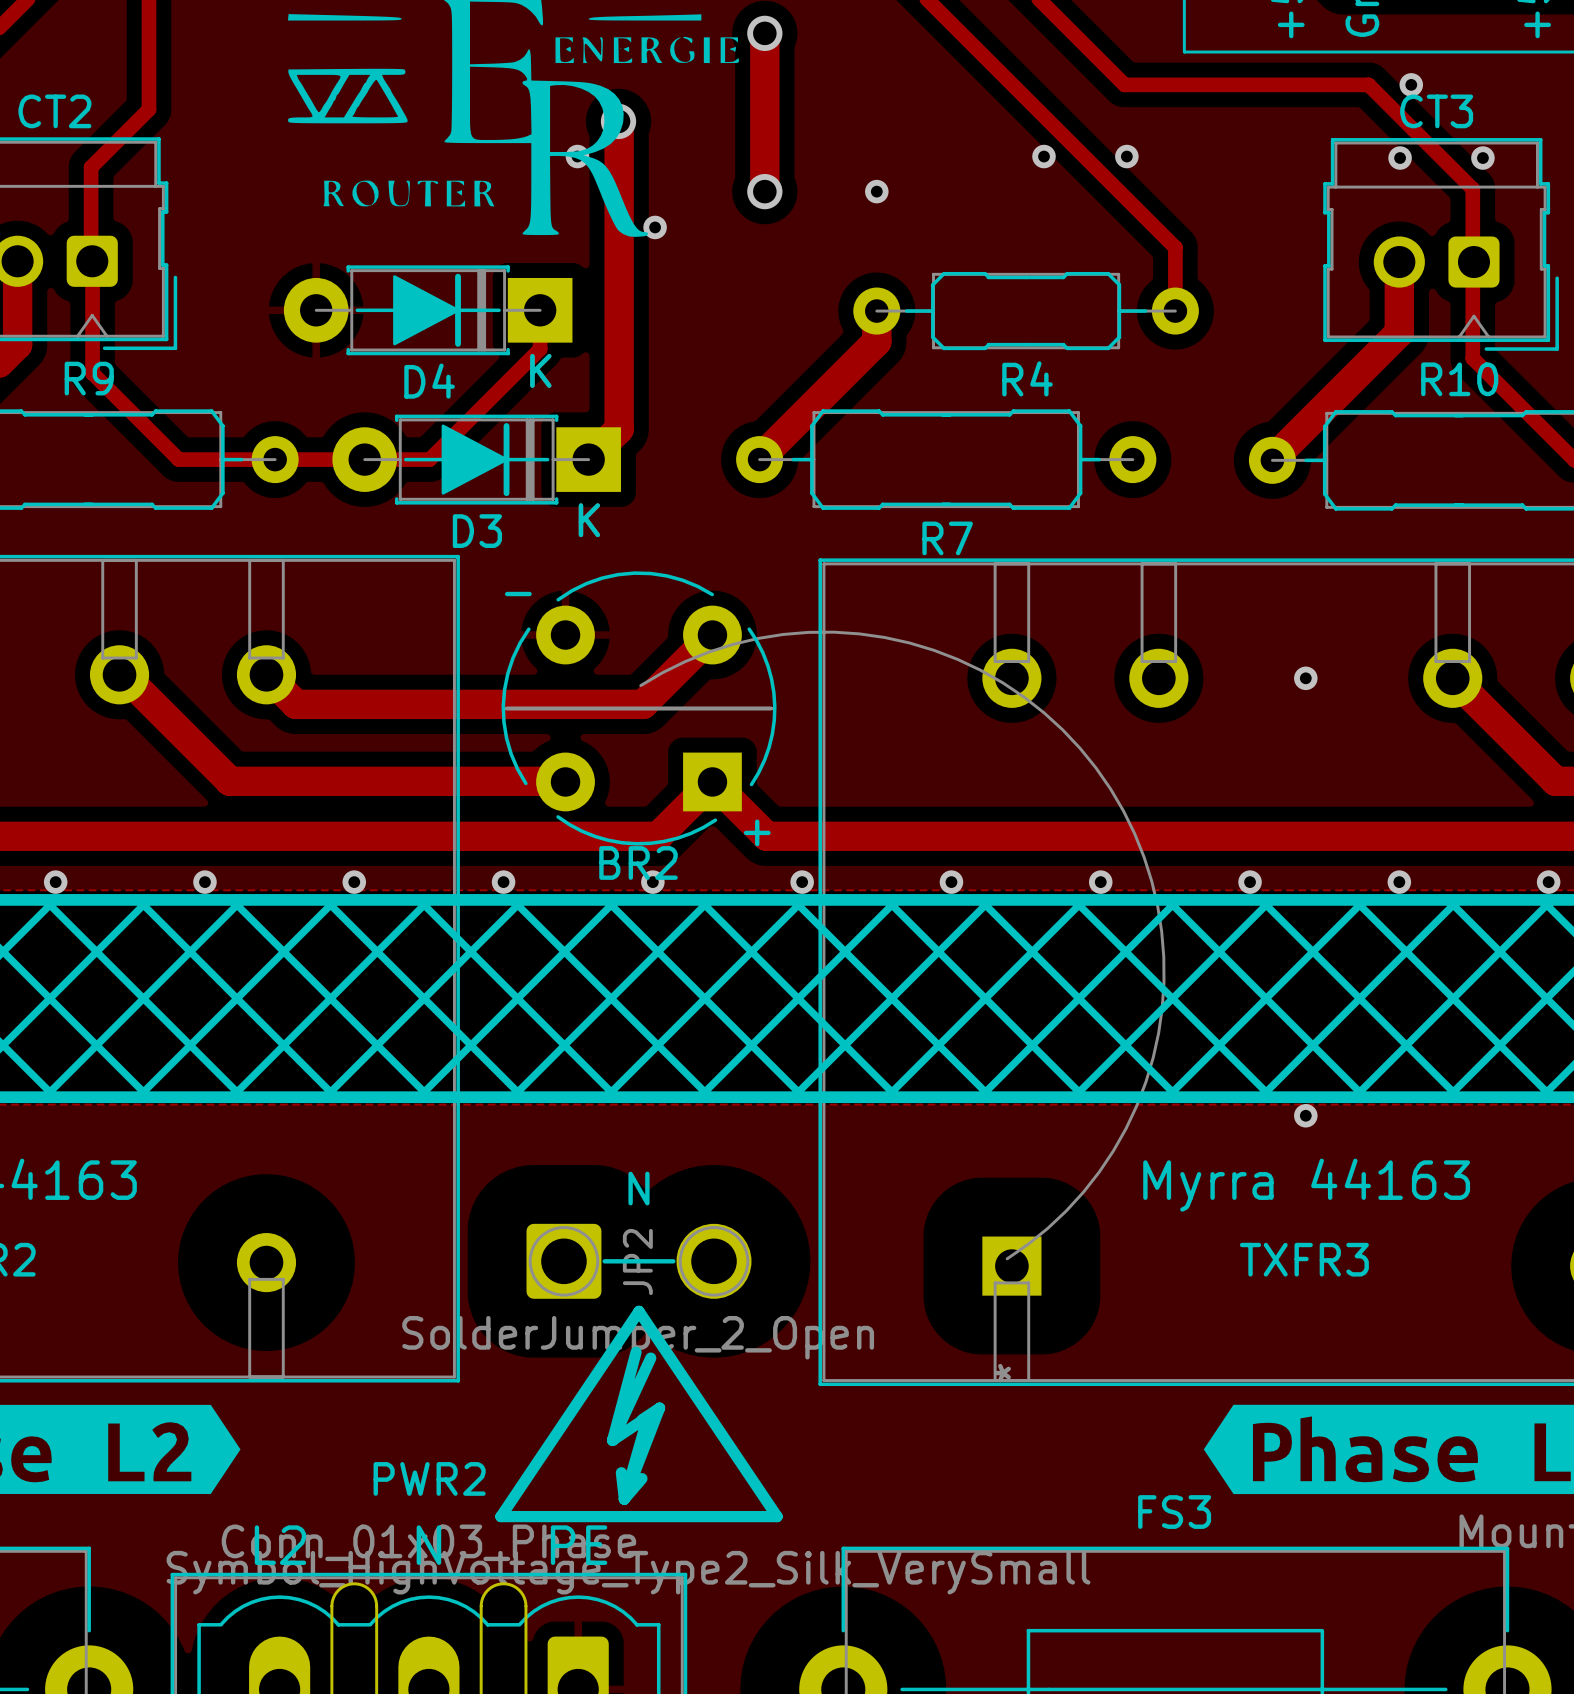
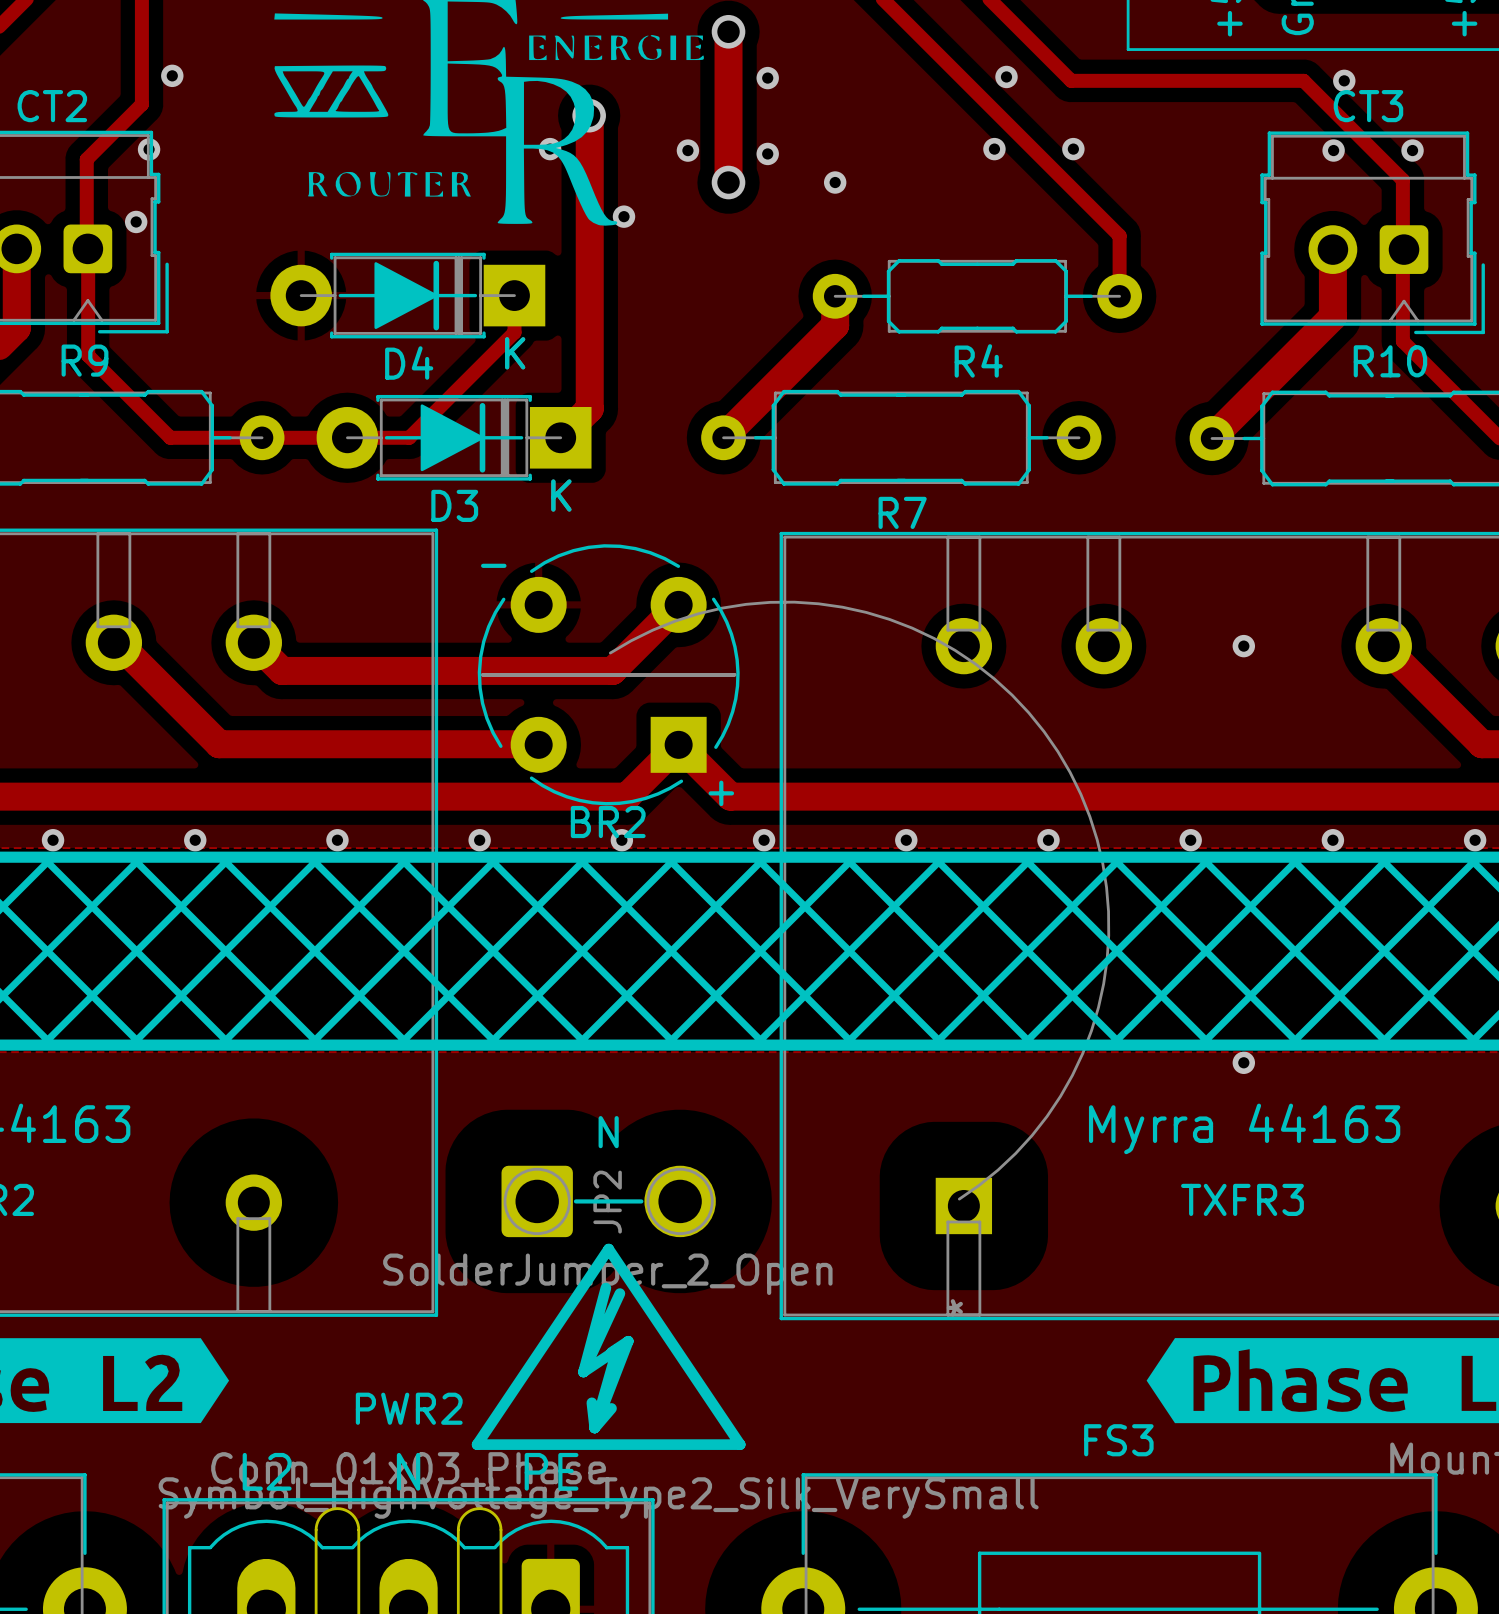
via: none -> (172, 75)
via: none -> (1006, 76)
via: none -> (767, 78)
via: none -> (149, 149)
via: none -> (687, 150)
via: none -> (767, 153)
via: none -> (136, 221)

